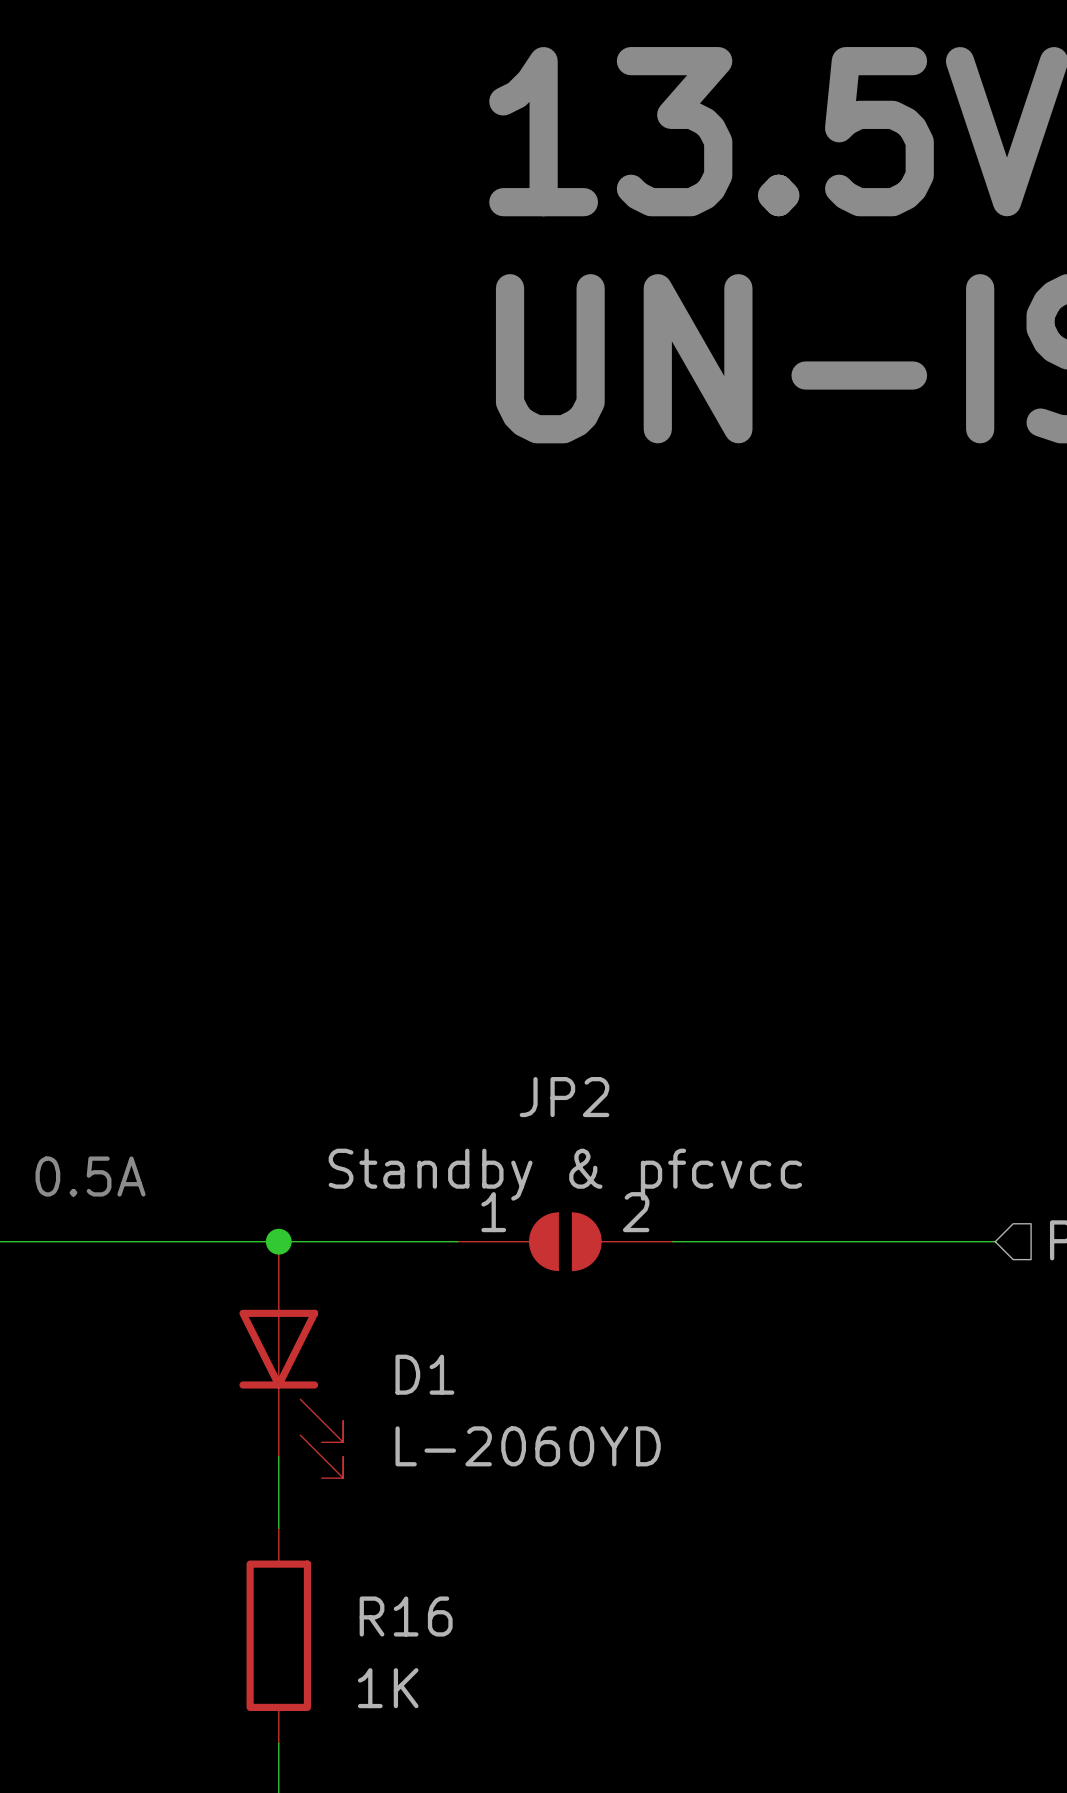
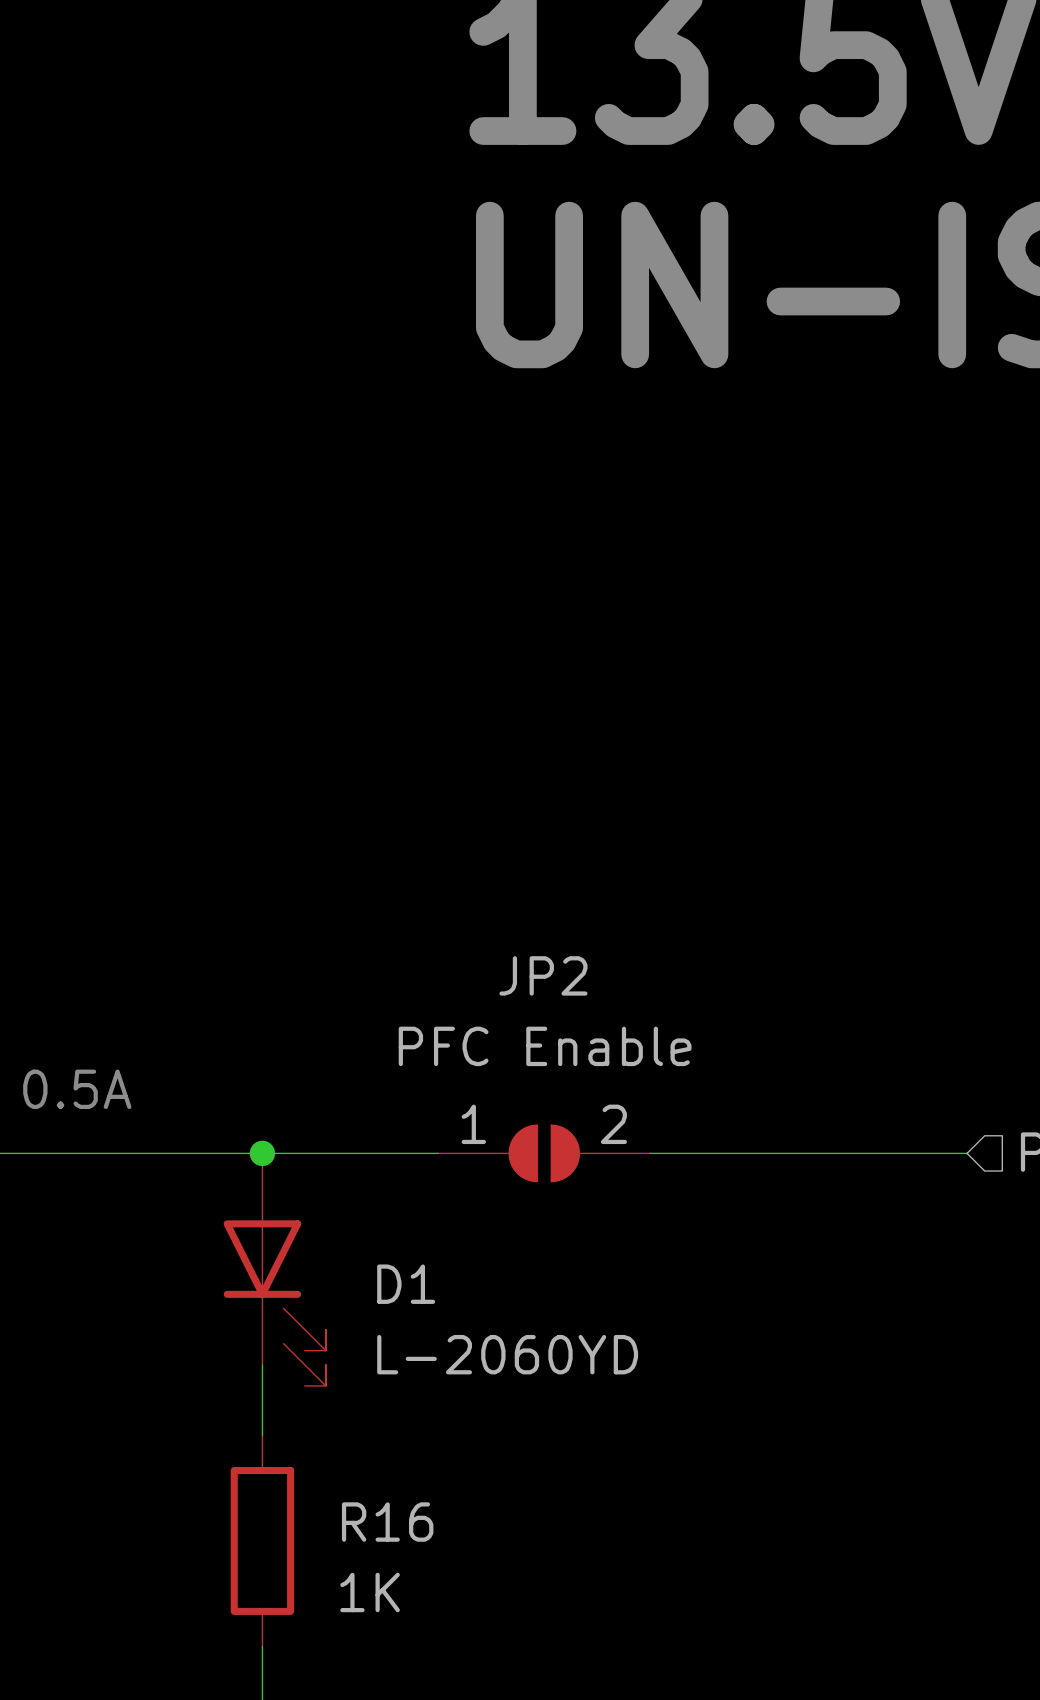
JP2 name position: JP2 (564, 1097) -> JP2 (543, 975)
JP2 value: Standby & pfcvcc (565, 1174) -> PFC Enable (545, 1046)

